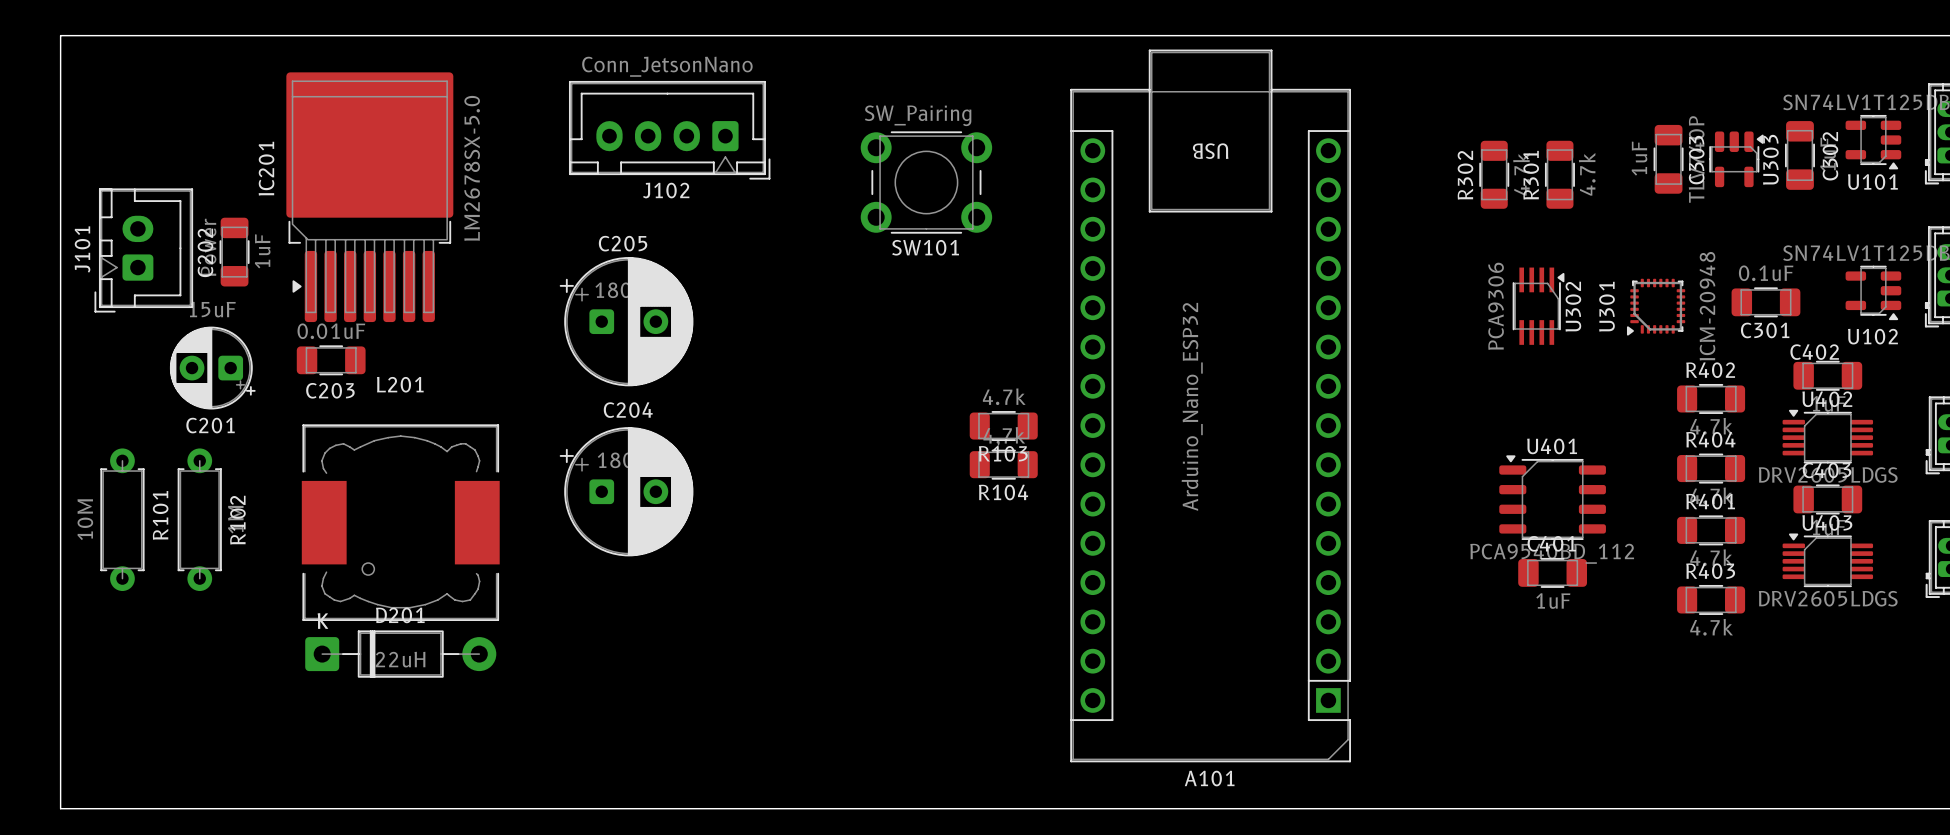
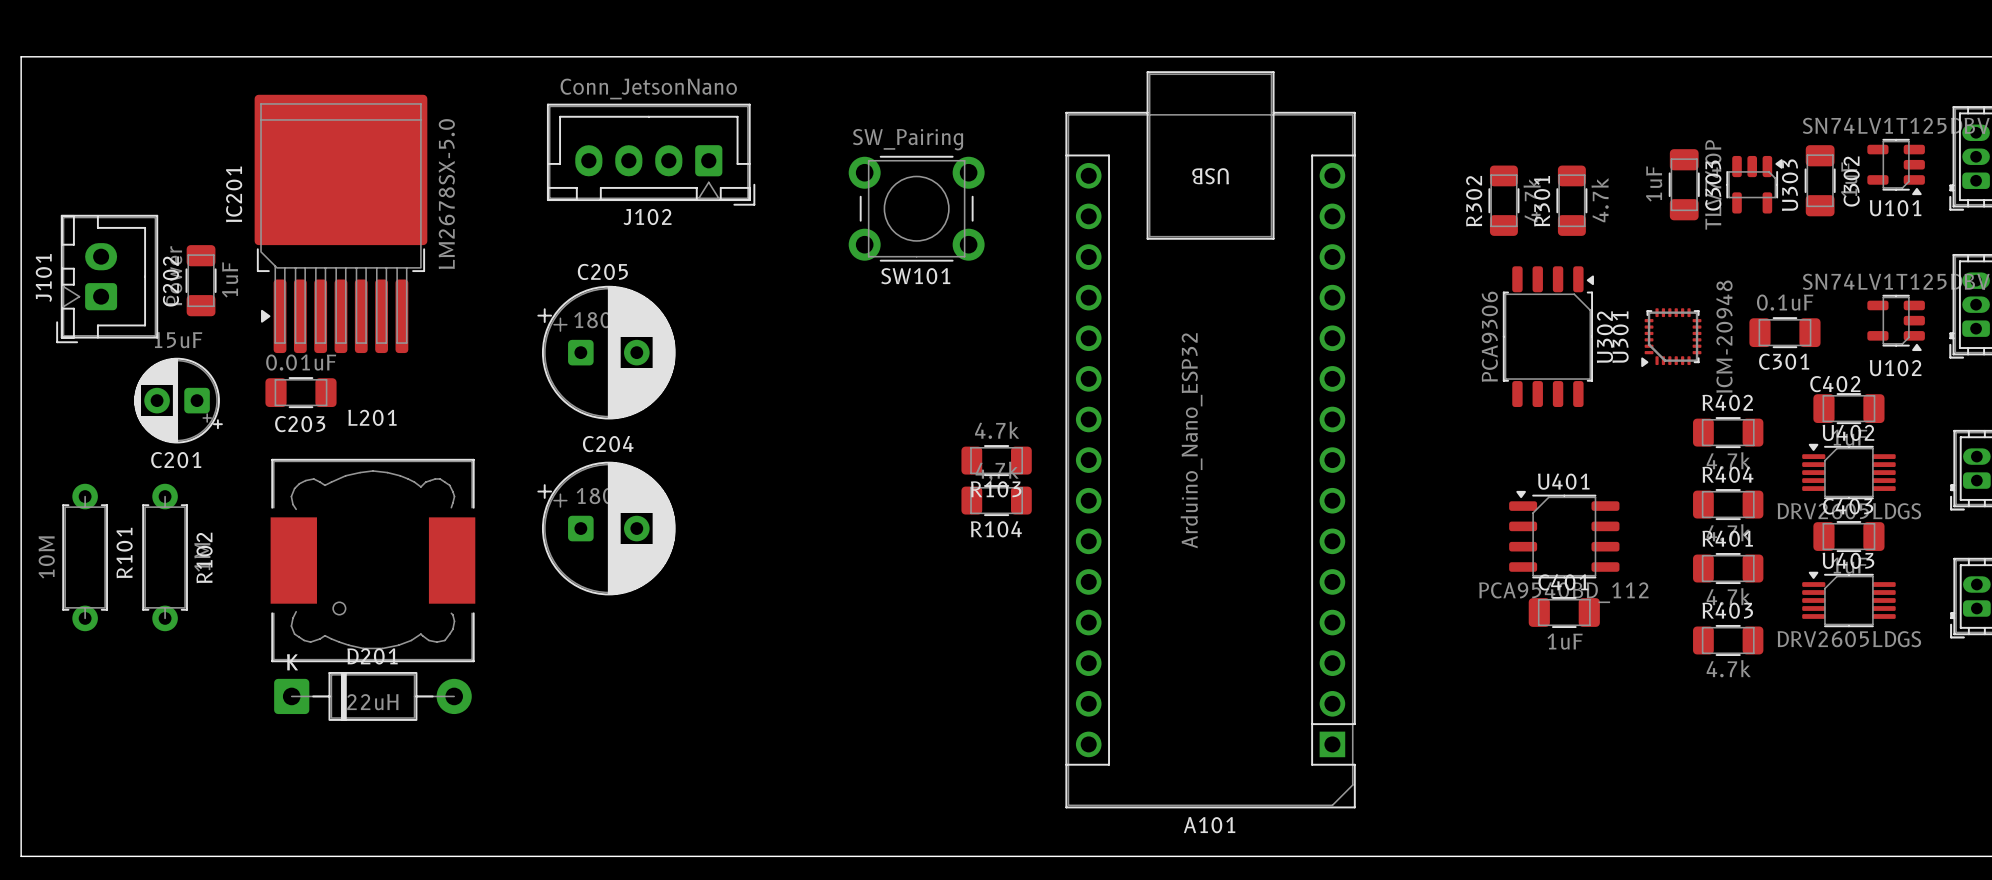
U302 footprint: [1512, 267, 1565, 345] -> [1502, 266, 1594, 408]

